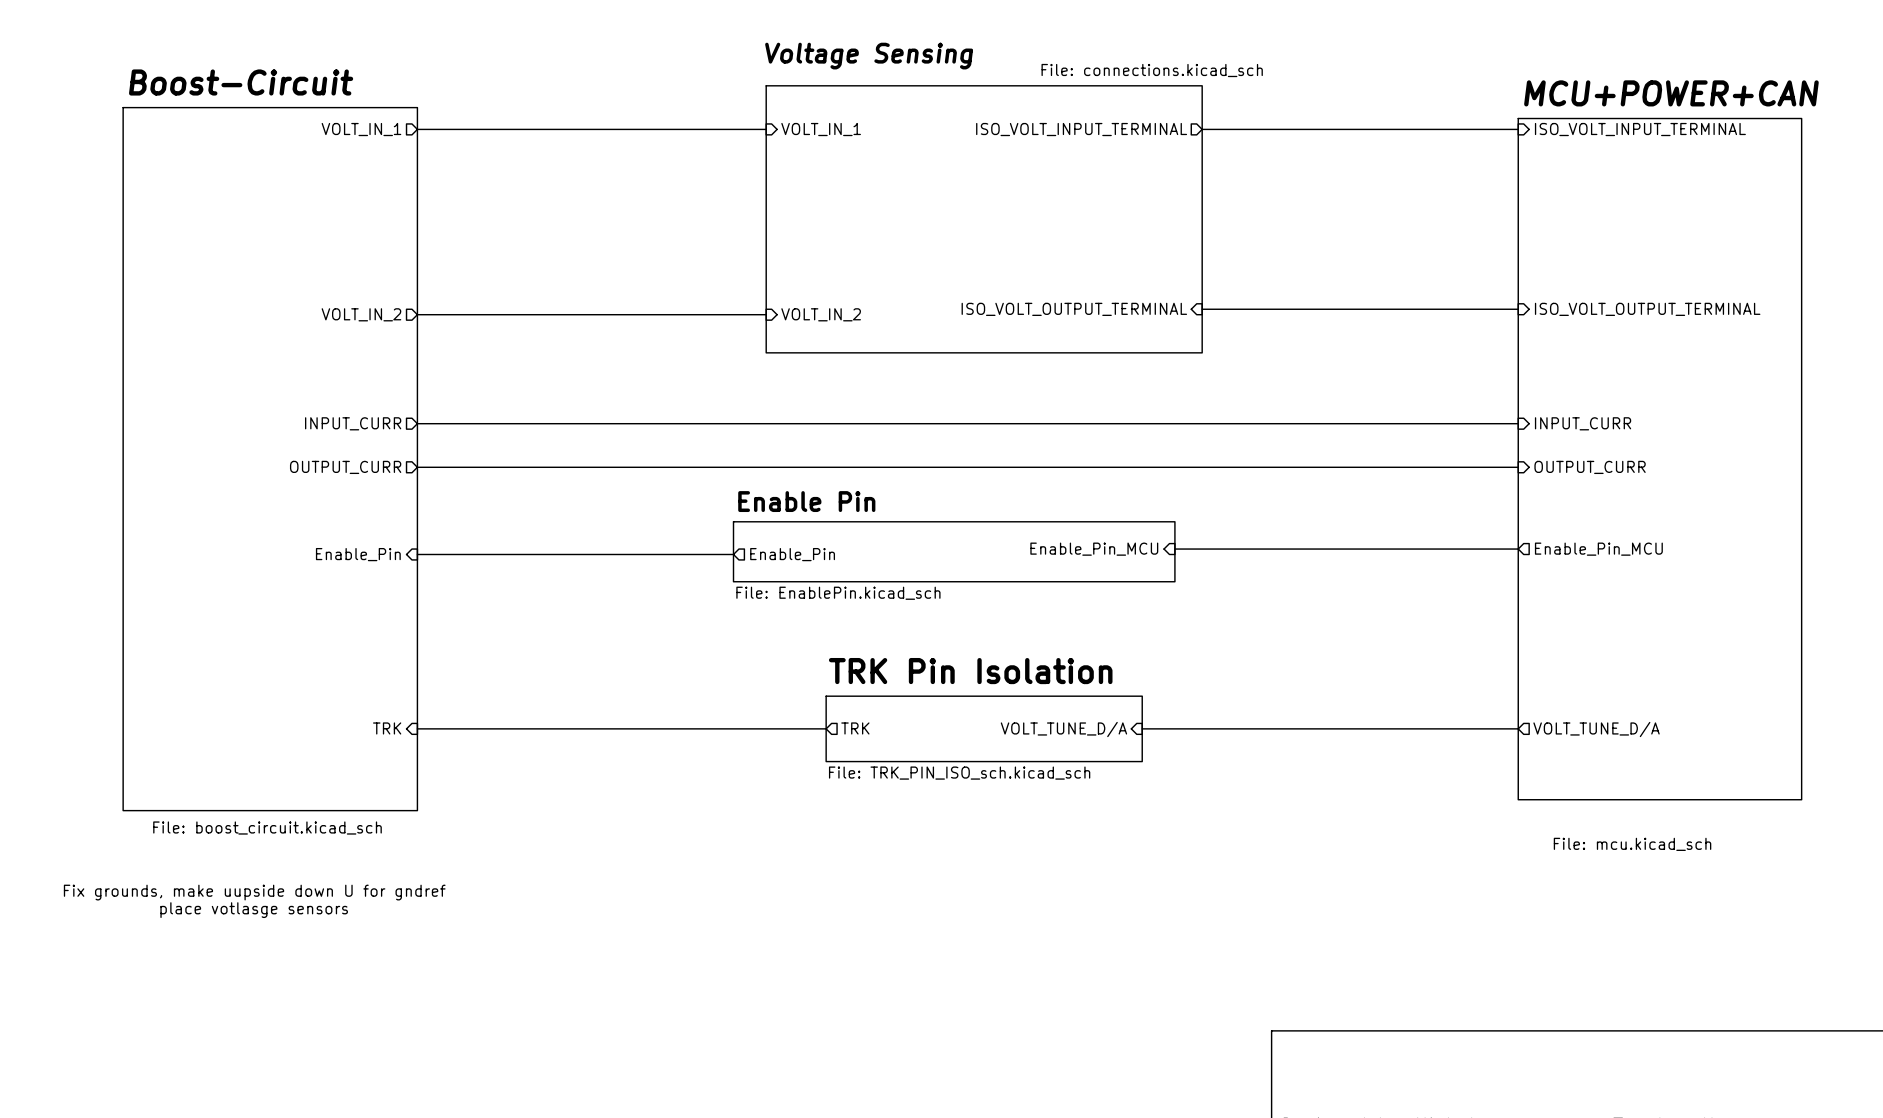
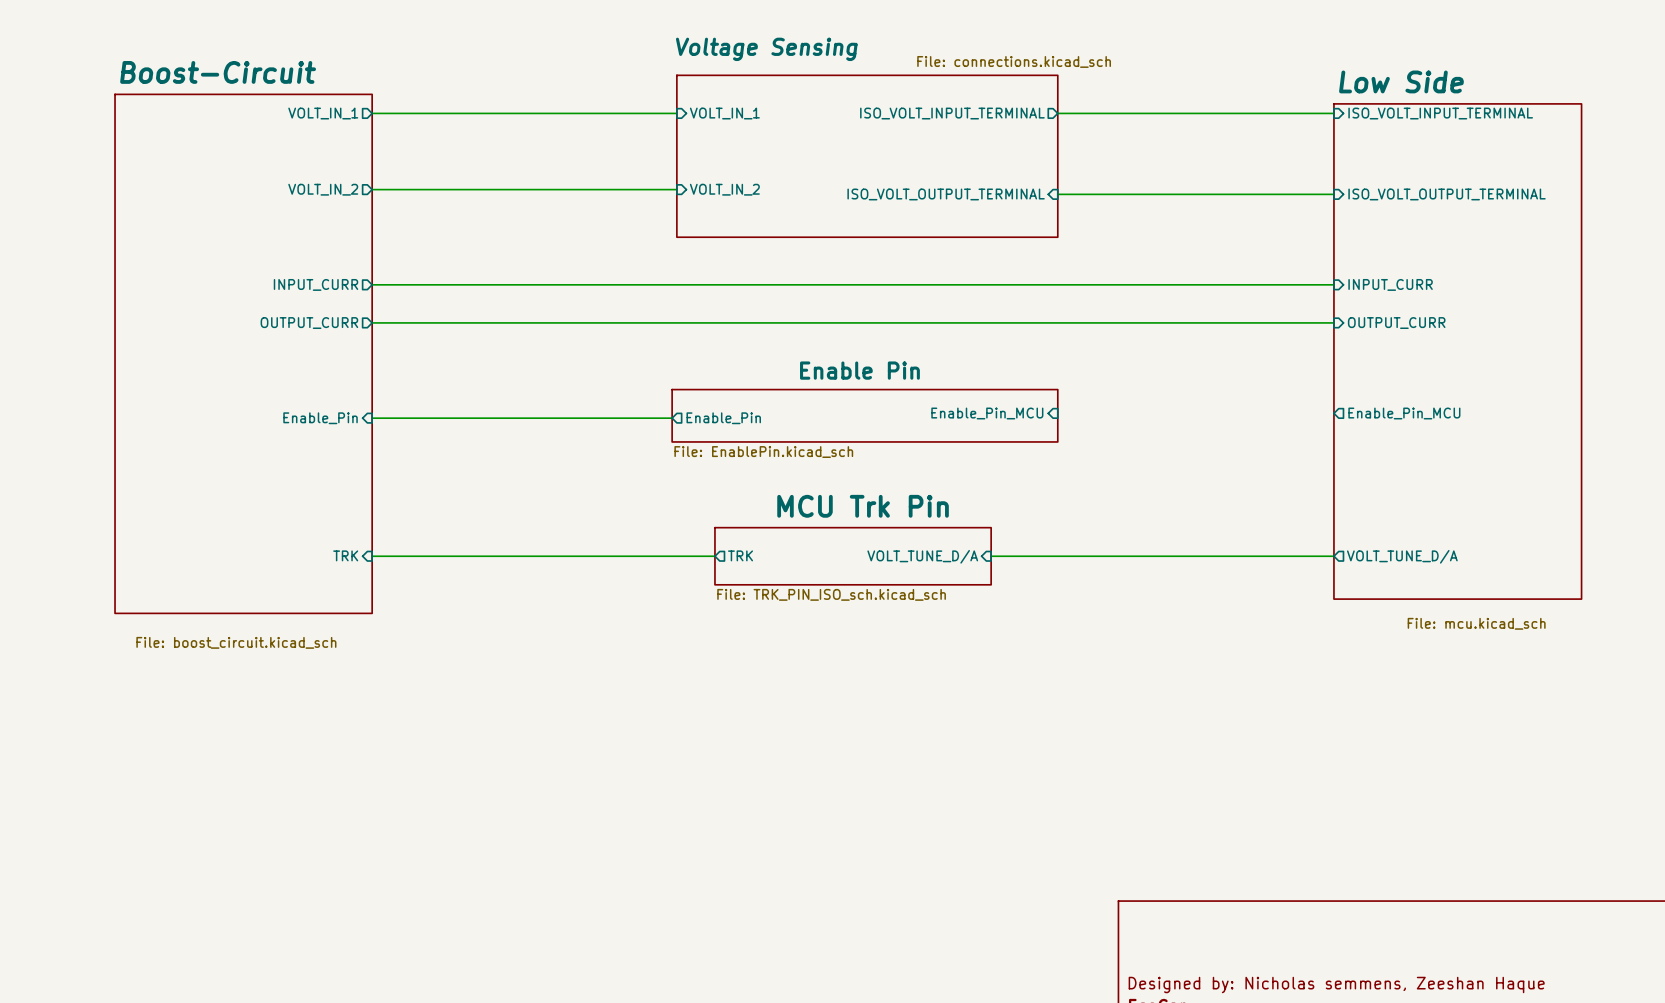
sheet Voltage Sensing: none -> File: connections.kicad_sch (867, 156)
sheet Voltage Sensing: File: connections.kicad_sch (984, 219) -> none
sheet pin position: ISO_VOLT_OUTPUT_TERMINAL (1074, 309) -> ISO_VOLT_OUTPUT_TERMINAL (946, 194)
wire: (1202, 309) (1518, 309) -> (1057, 194) (1333, 194)
sheet pin position: ISO_VOLT_OUTPUT_TERMINAL (1647, 309) -> ISO_VOLT_OUTPUT_TERMINAL (1447, 194)
sheet pin position: VOLT_IN_2 (361, 314) -> VOLT_IN_2 (323, 189)
wire: (417, 314) (766, 314) -> (372, 189) (676, 189)
sheet pin position: VOLT_IN_2 (821, 314) -> VOLT_IN_2 (724, 189)
sheet Low Side: none -> File: mcu.kicad_sch (1457, 351)
sheet Boost-Circuit: none -> File: boost_circuit.kicad_sch (243, 353)
sheet pin position: INPUT_CURR (353, 423) -> INPUT_CURR (315, 284)
wire: (417, 423) (1518, 423) -> (372, 284) (1333, 284)
sheet pin position: INPUT_CURR (1583, 423) -> INPUT_CURR (1390, 284)
sheet Boost-Circuit: File: boost_circuit.kicad_sch (270, 459) -> none
sheet MCU+POWER+CAN: File: mcu.kicad_sch (1659, 459) -> none
sheet pin position: OUTPUT_CURR (345, 467) -> OUTPUT_CURR (309, 323)
wire: (417, 467) (1518, 467) -> (372, 322) (1333, 322)
sheet pin position: OUTPUT_CURR (1590, 467) -> OUTPUT_CURR (1396, 323)
wire: none -> (372, 418) (672, 418)
sheet Enable Pin name position: Enable Pin (806, 501) -> Enable Pin (859, 370)
sheet pin position: Enable_Pin_MCU (1094, 549) -> Enable_Pin_MCU (987, 413)
wire: (1174, 549) (1518, 549) -> none
sheet pin position: Enable_Pin_MCU (1598, 549) -> Enable_Pin_MCU (1404, 413)
sheet Enable Pin position: (954, 551) -> (864, 415)
sheet pin position: Enable_Pin (358, 554) -> Enable_Pin (320, 418)
wire: (417, 554) (733, 554) -> none
sheet pin position: Enable_Pin (792, 554) -> Enable_Pin (723, 418)
wire: none -> (372, 556) (714, 556)
sheet MCU Trk Pin: none -> File: TRK_PIN_ISO_sch.kicad_sch (853, 556)
wire: none -> (991, 556) (1333, 556)
sheet pin position: TRK (387, 728) -> TRK (345, 555)
wire: (417, 728) (826, 728) -> none
sheet pin position: TRK (855, 728) -> TRK (740, 555)
sheet TRK Pin Isolation: File: TRK_PIN_ISO_sch.kicad_sch (984, 728) -> none
wire: (1142, 728) (1518, 728) -> none
sheet pin position: VOLT_TUNE_D/A (1063, 729) -> VOLT_TUNE_D/A (922, 556)
sheet pin position: VOLT_TUNE_D/A (1596, 729) -> VOLT_TUNE_D/A (1402, 556)
text: Fix grounds, make uupside down U for gndref (254, 892) -> none
text: place votlasge sensors (254, 910) -> none

